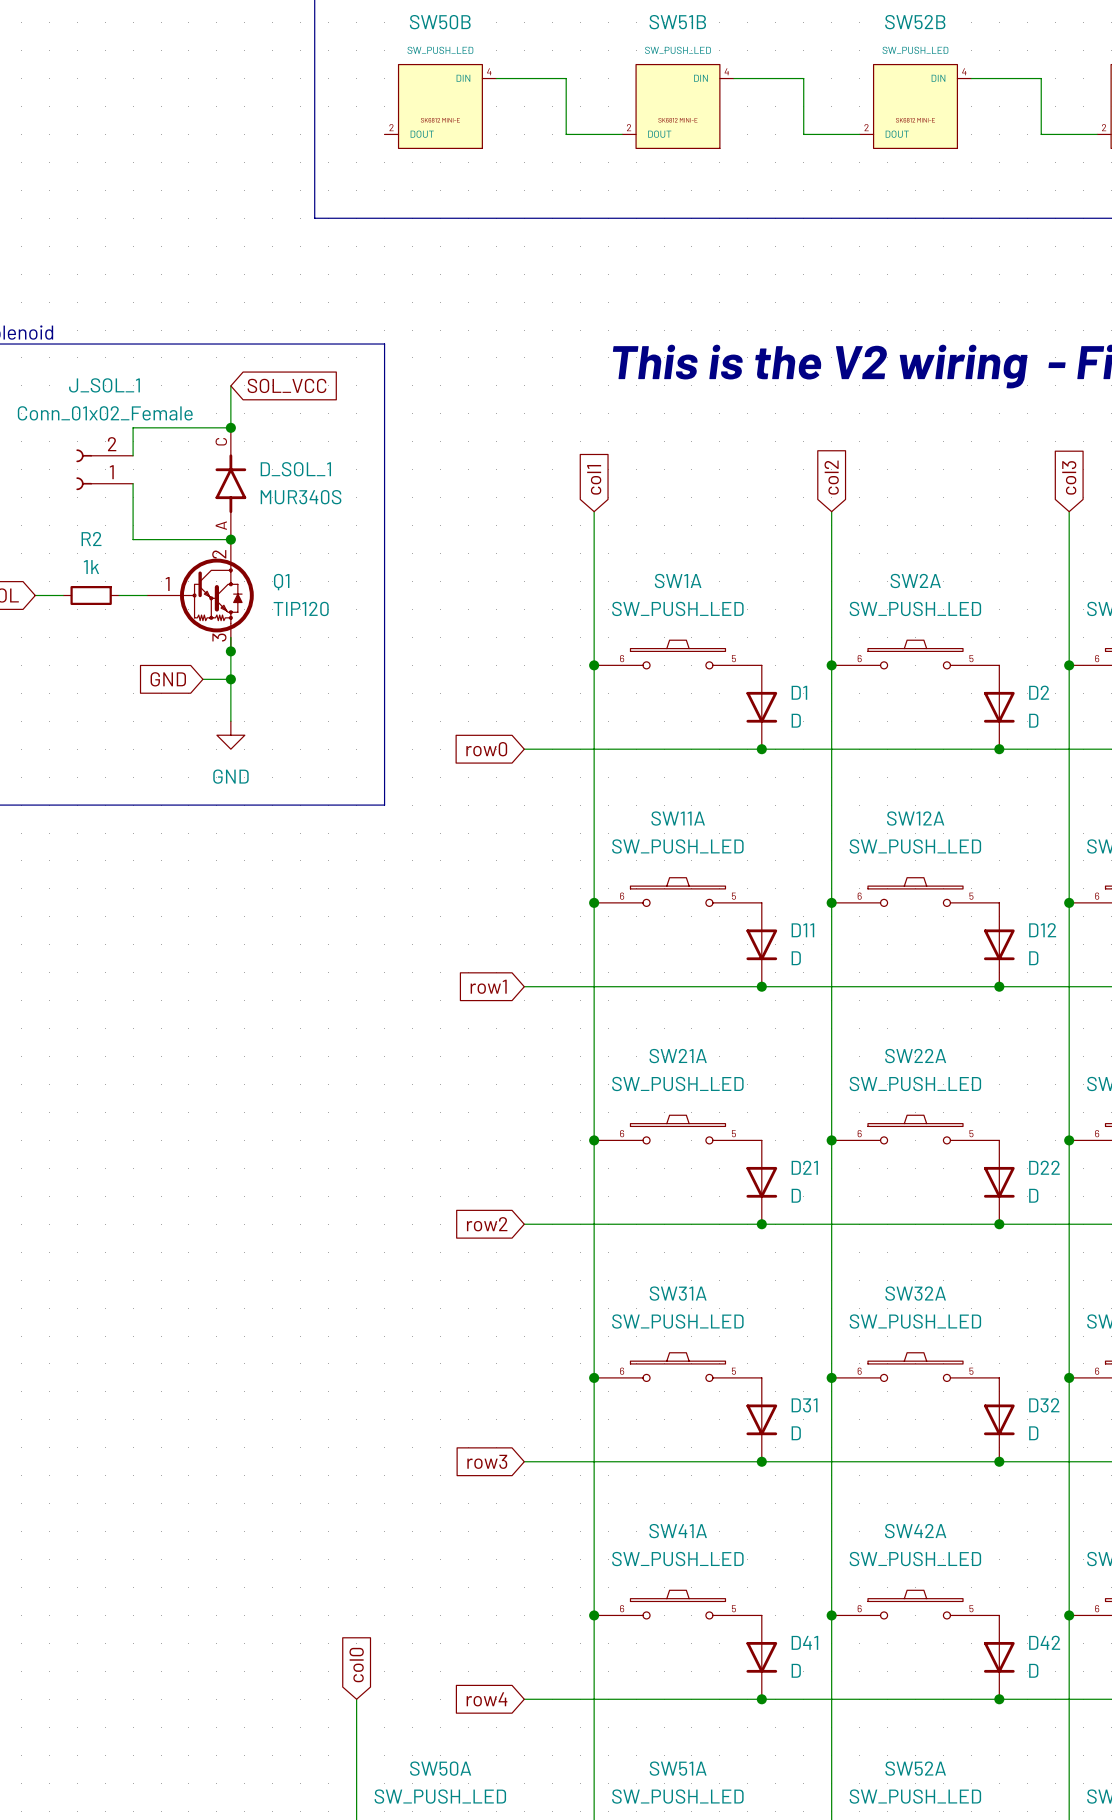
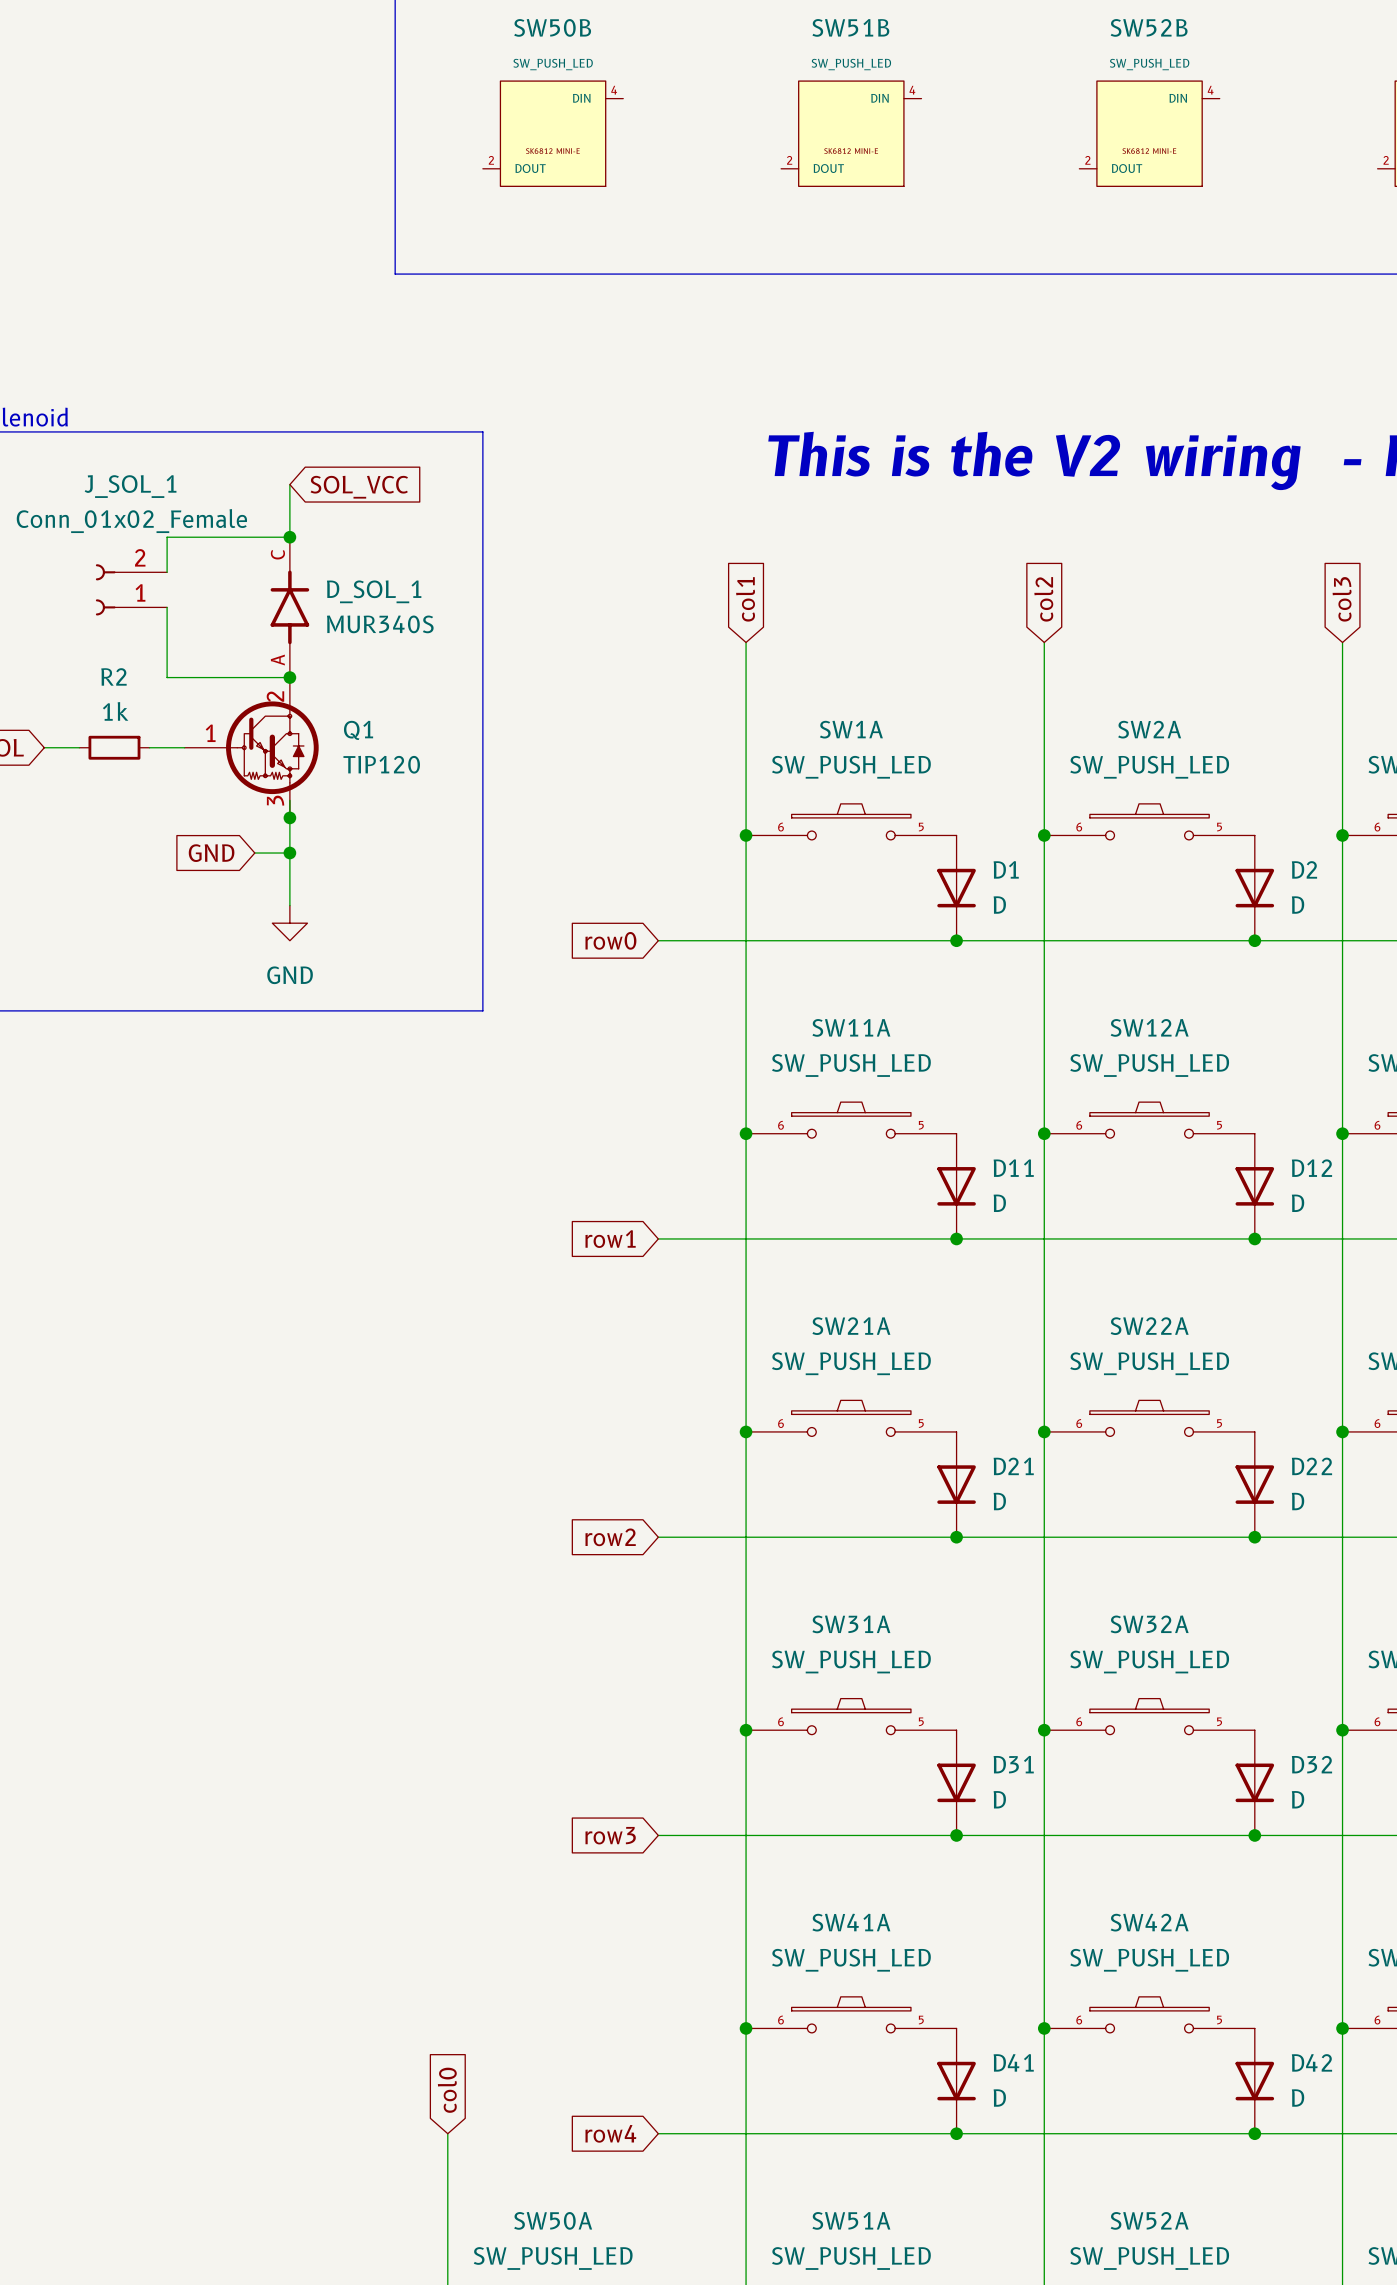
wire: (496, 78) (566, 78) (566, 134) (622, 134) -> none
wire: (733, 78) (803, 78) (803, 134) (859, 134) -> none
wire: (971, 78) (1041, 78) (1041, 134) (1097, 134) -> none

